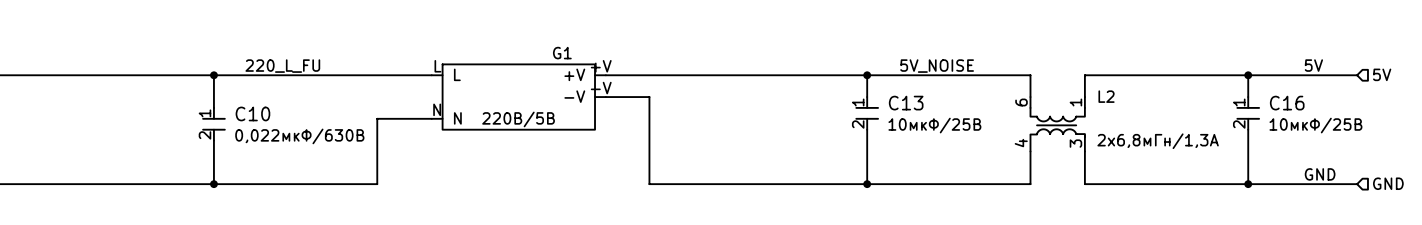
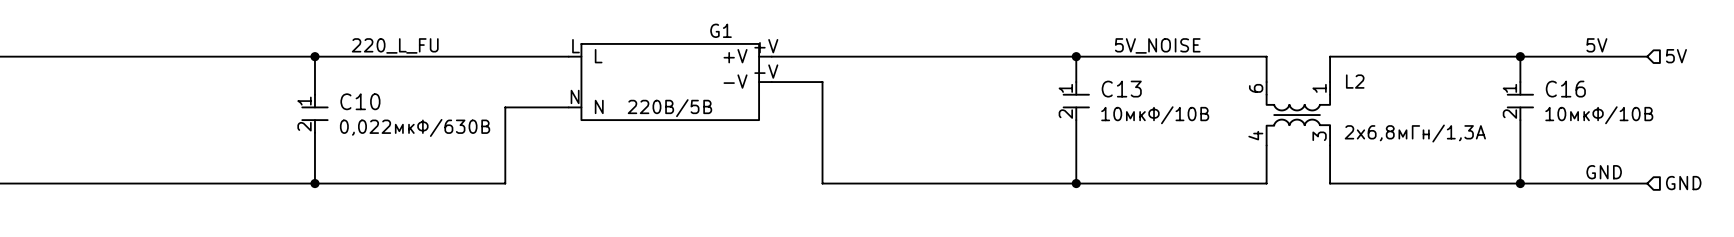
C13 text: 10мкФ/25В (934, 125) -> 10мкФ/10В (1155, 115)
C16 text: 10мкФ/25В (1315, 125) -> 10мкФ/10В (1599, 115)

